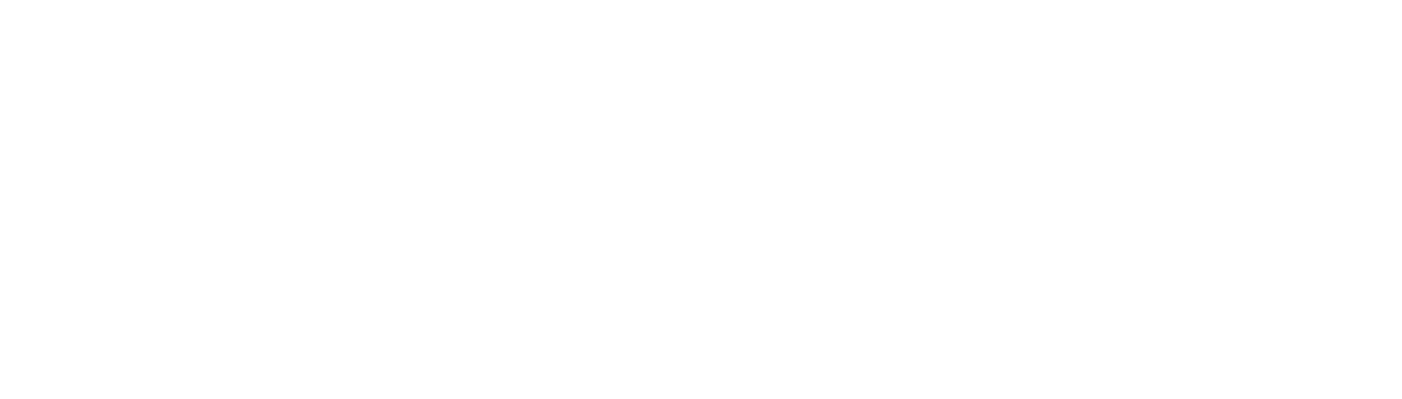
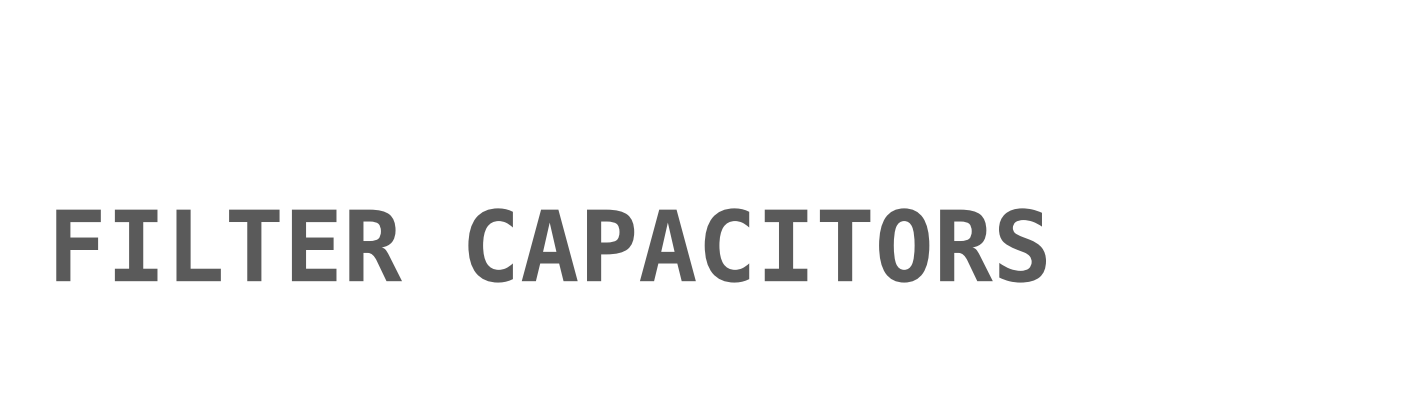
text: none -> FILTER CAPACITORS (551, 245)

